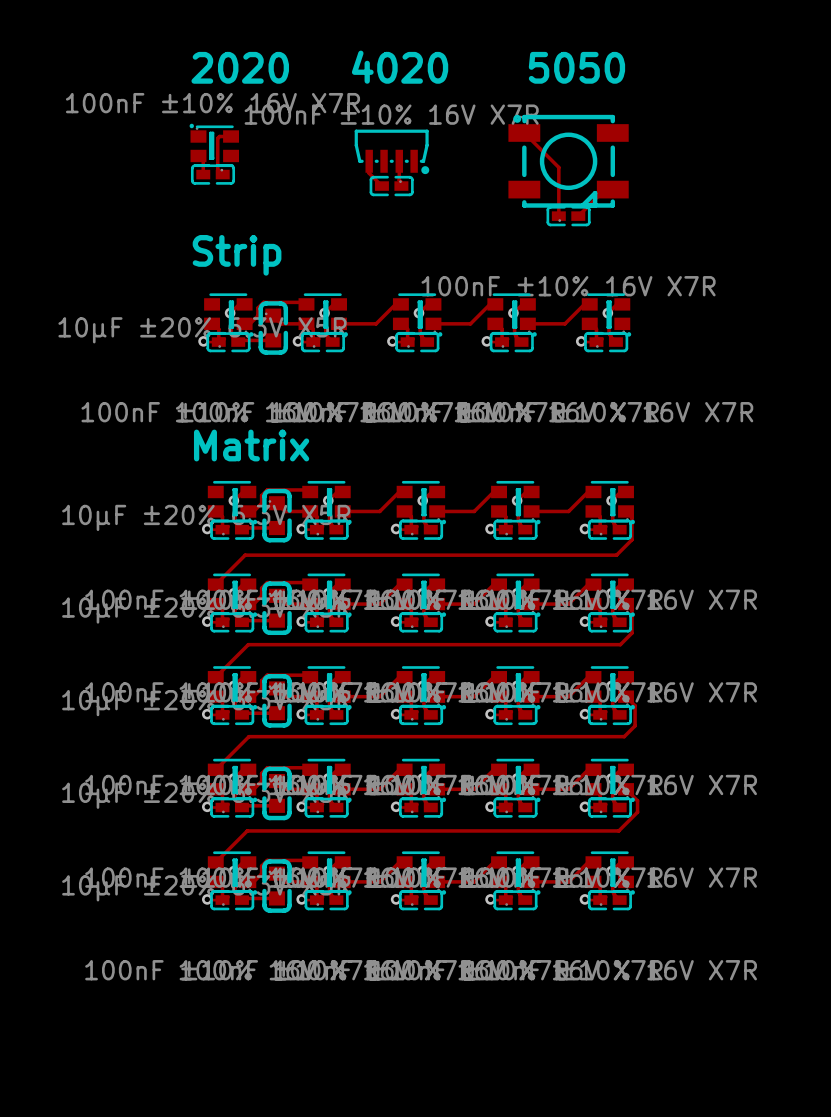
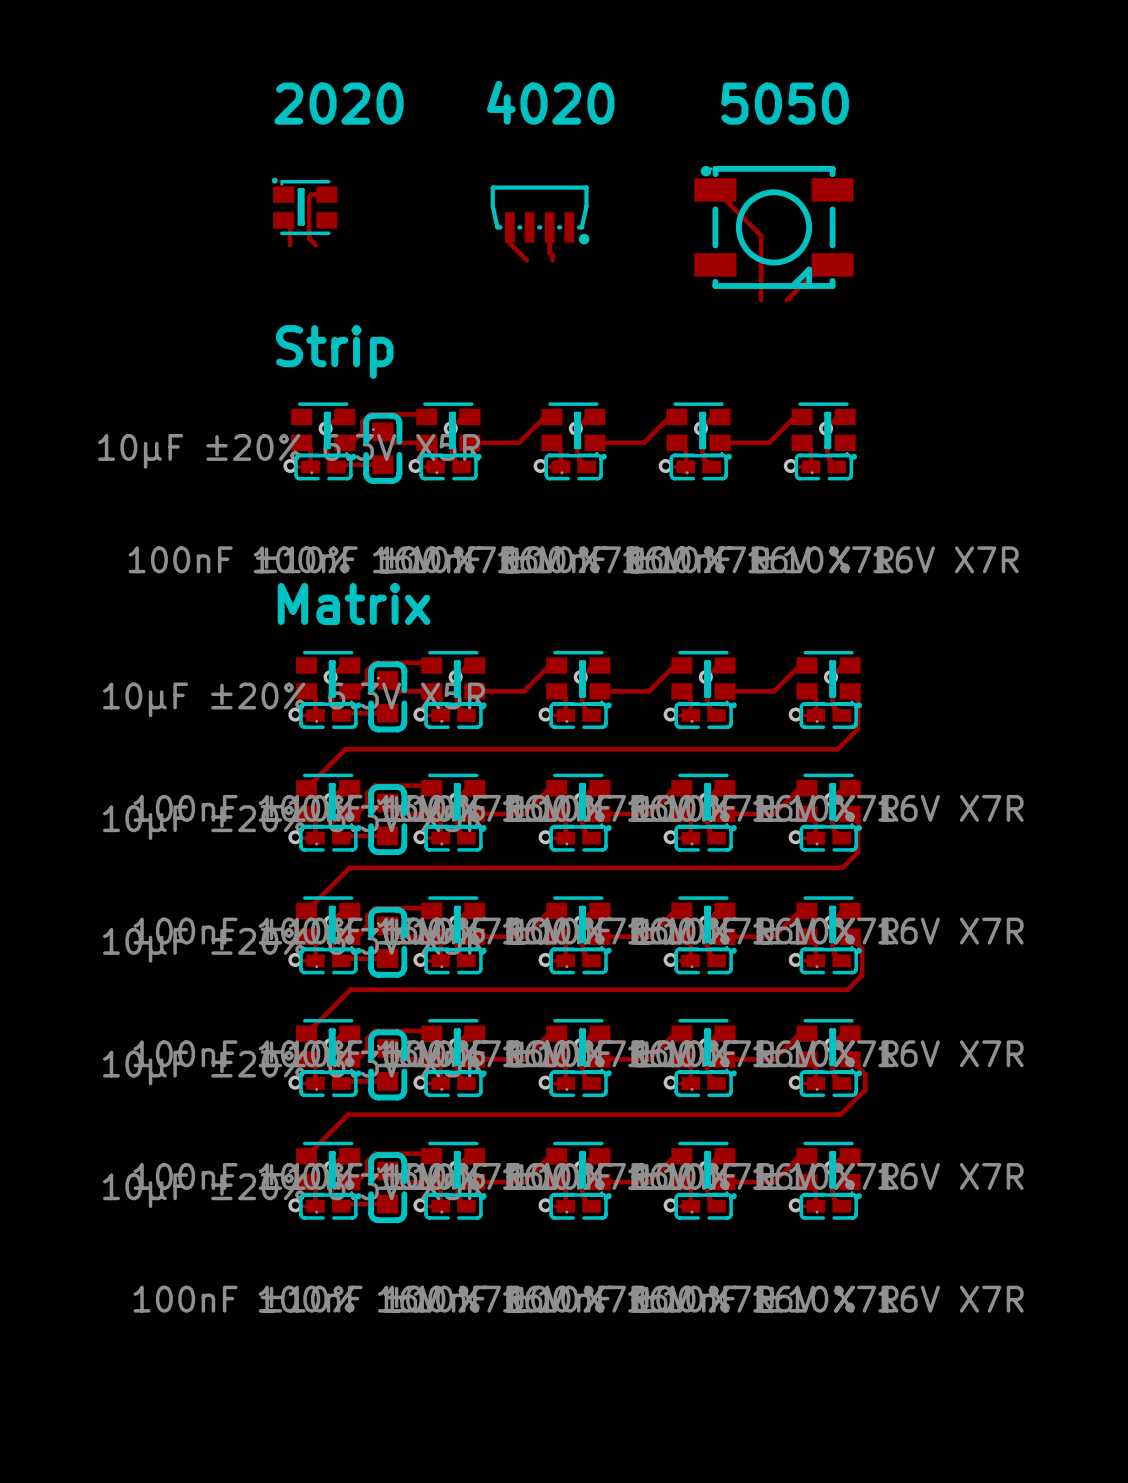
part: 100nF ±10% 16V X7R (212, 174) -> none
part: 100nF ±10% 16V X7R (391, 186) -> none
part: 100nF ±10% 16V X7R (568, 216) -> none

